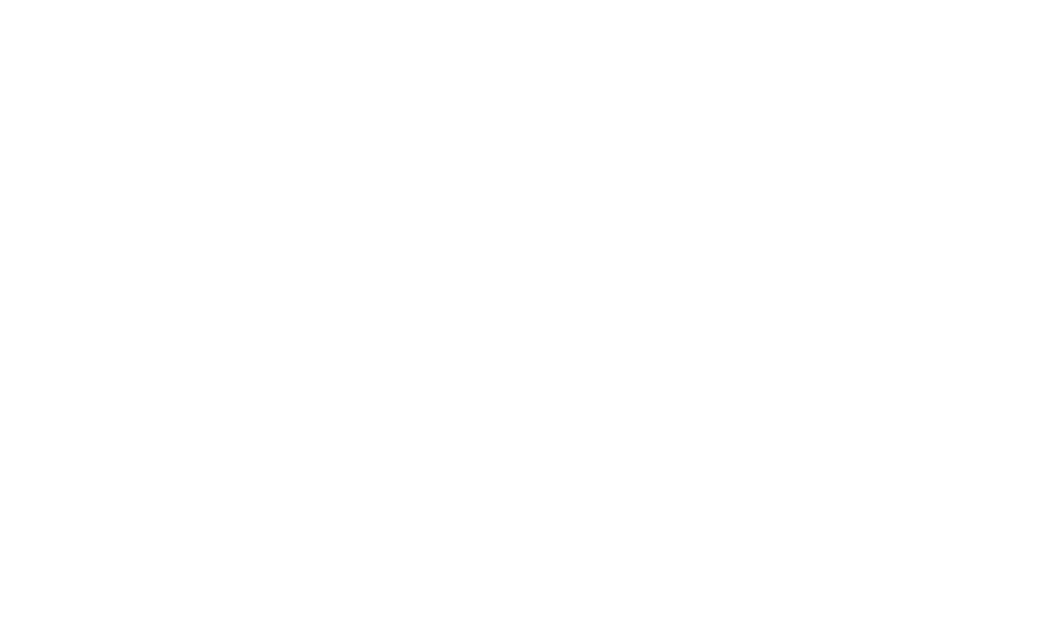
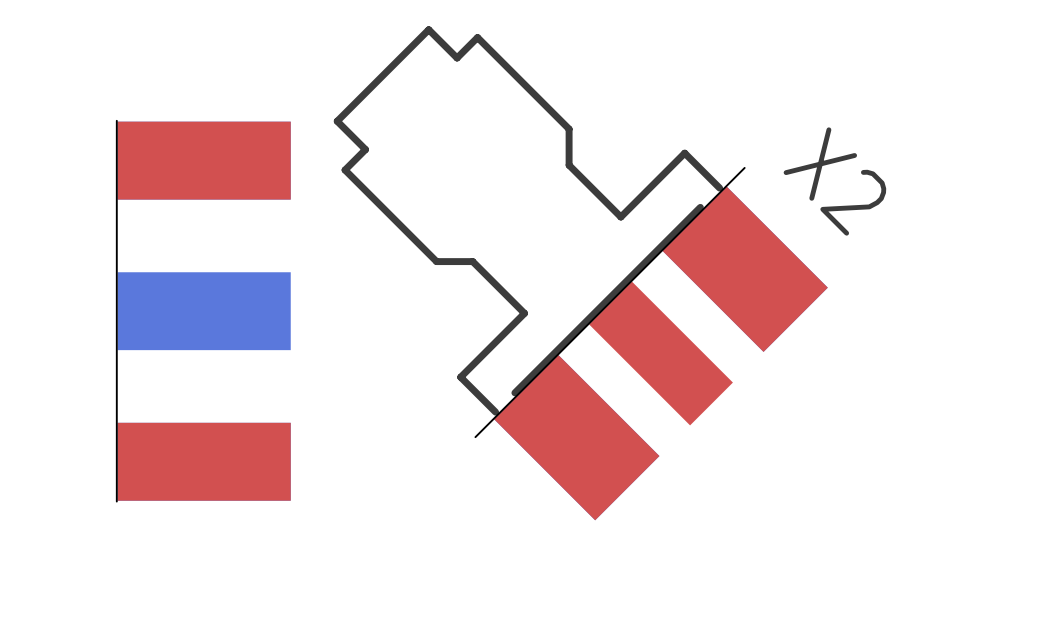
X2: none -> (580, 273)
part: none -> (203, 311)

